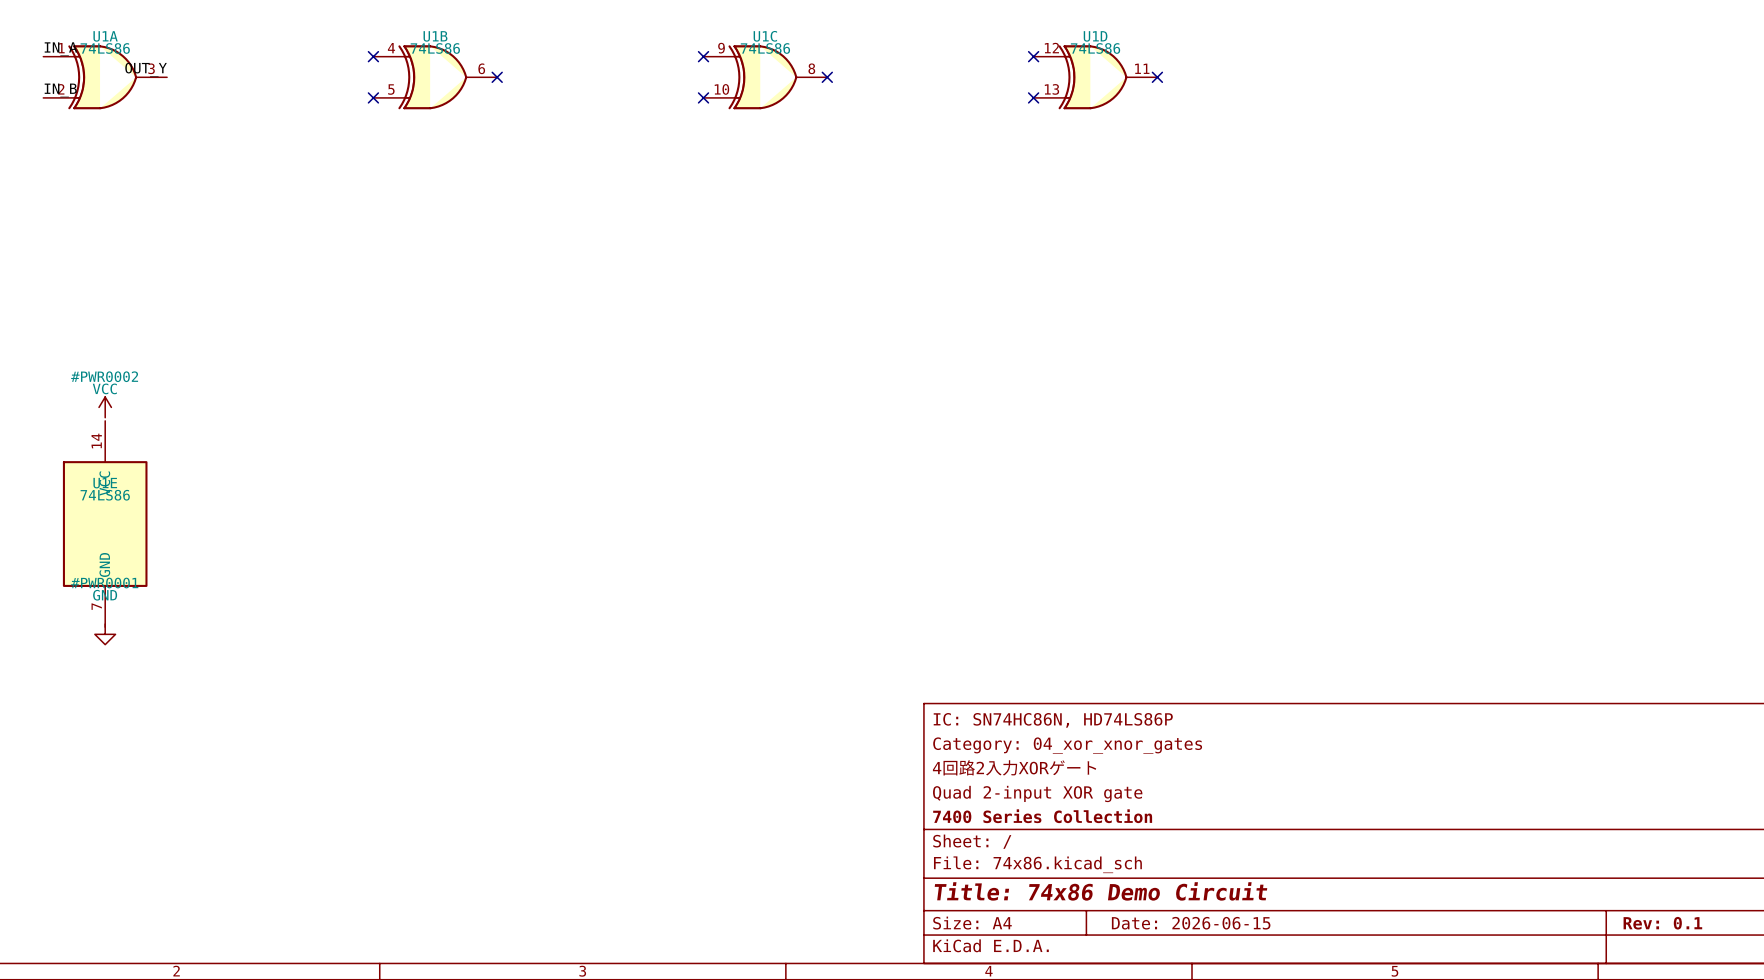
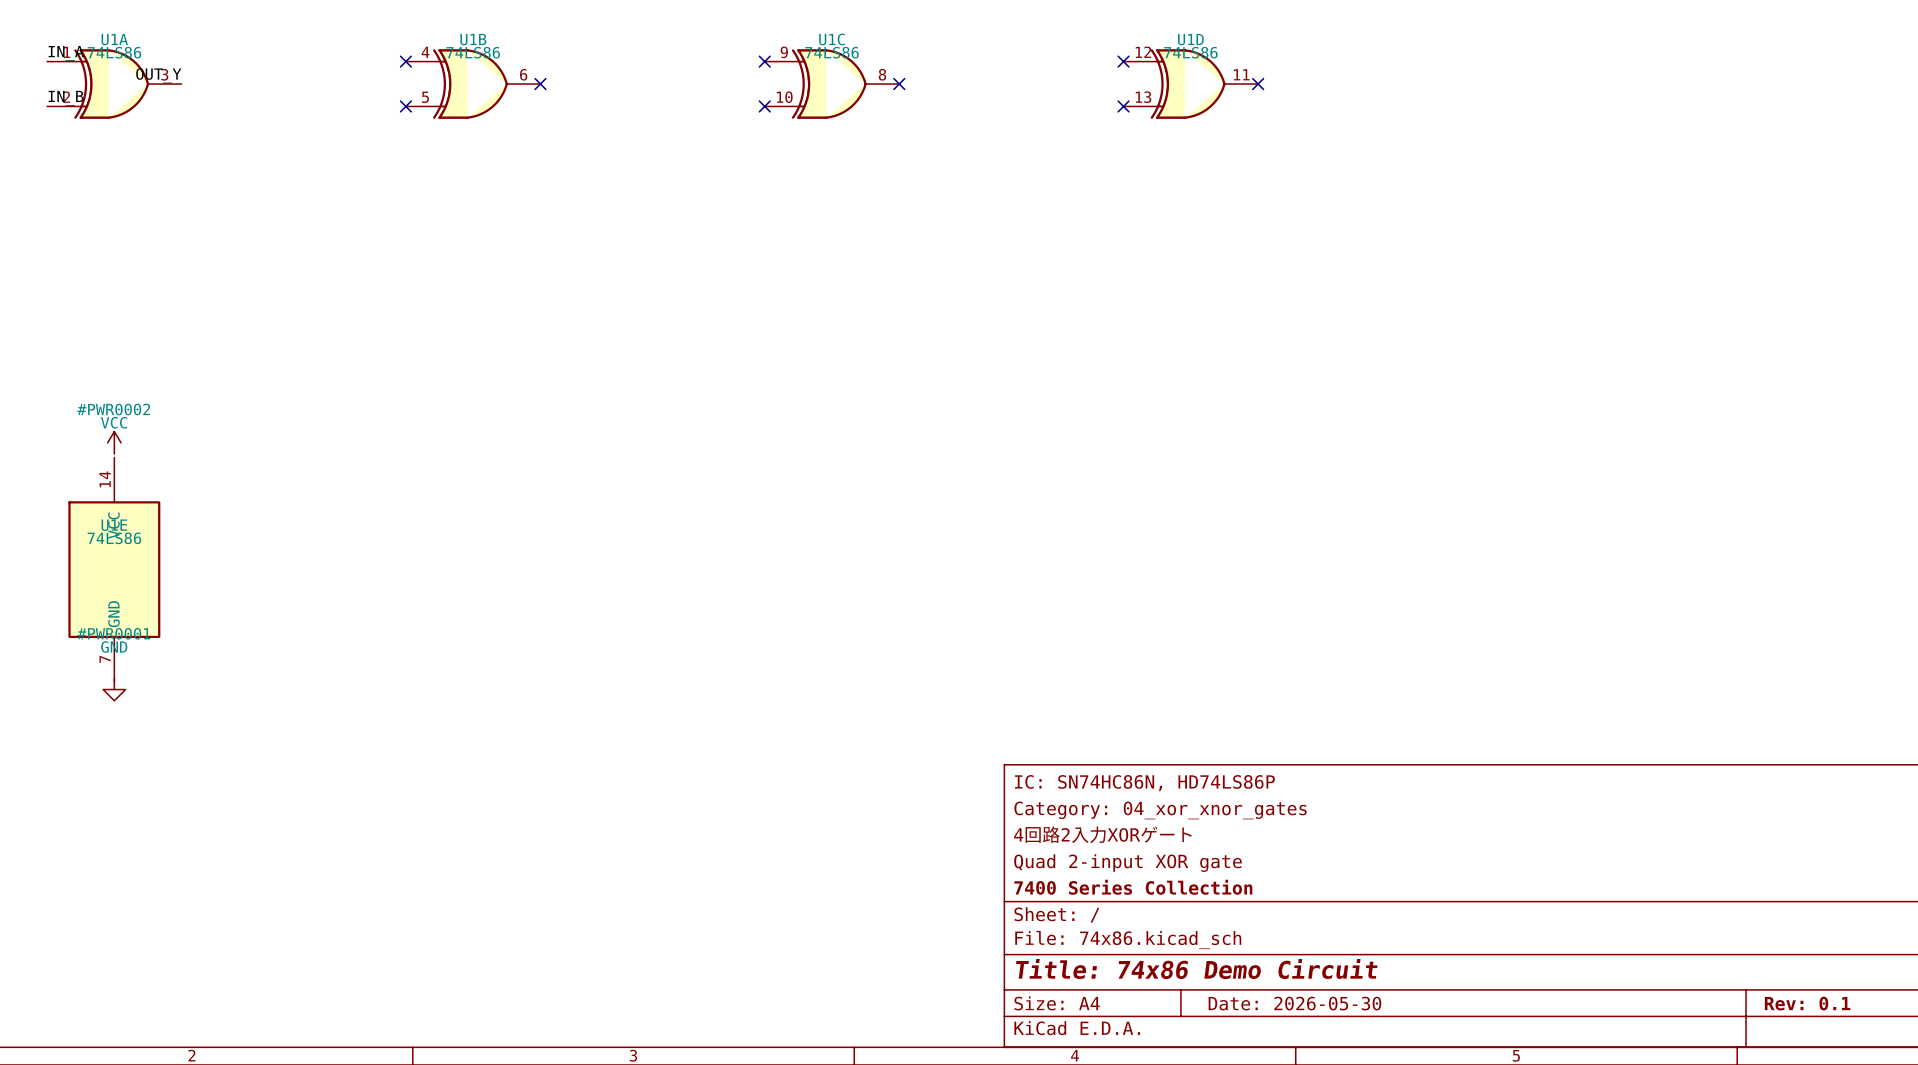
title block: Date: 2026-06-15 (1191, 923) -> Date: 2026-05-30 (1294, 1003)

